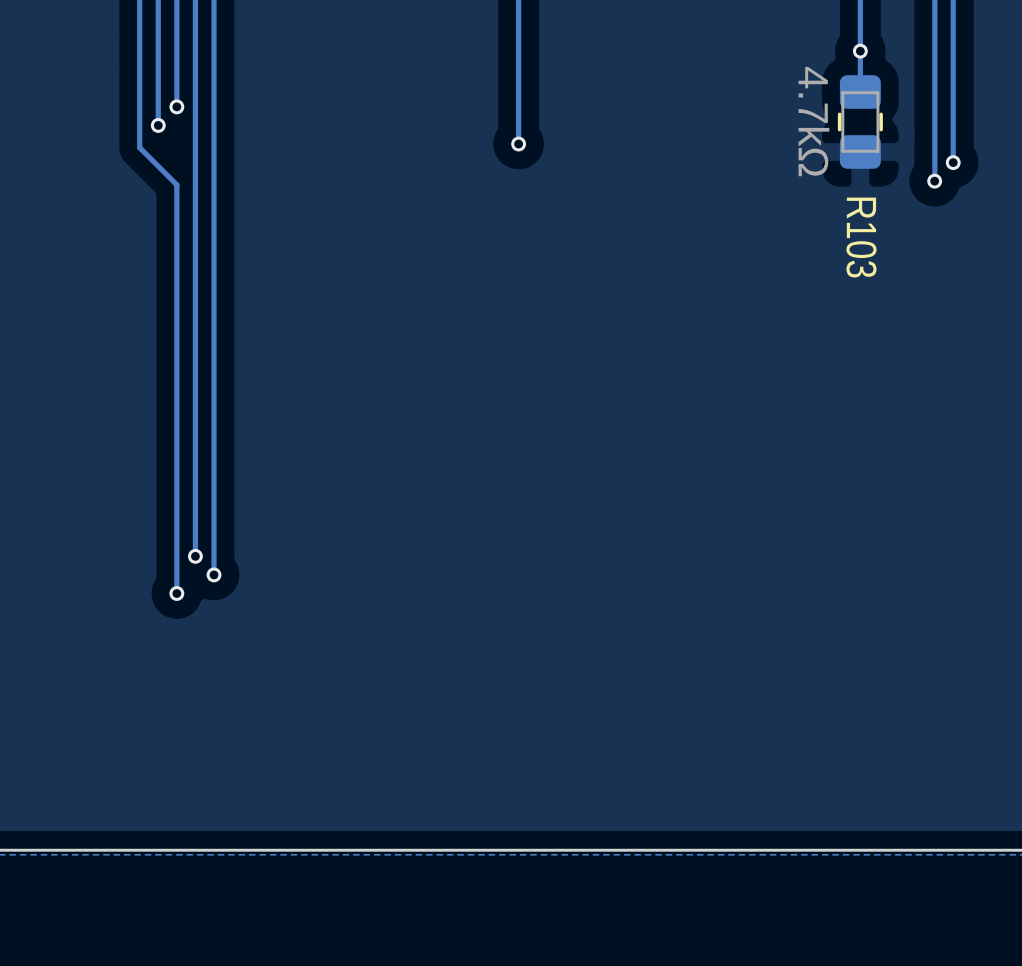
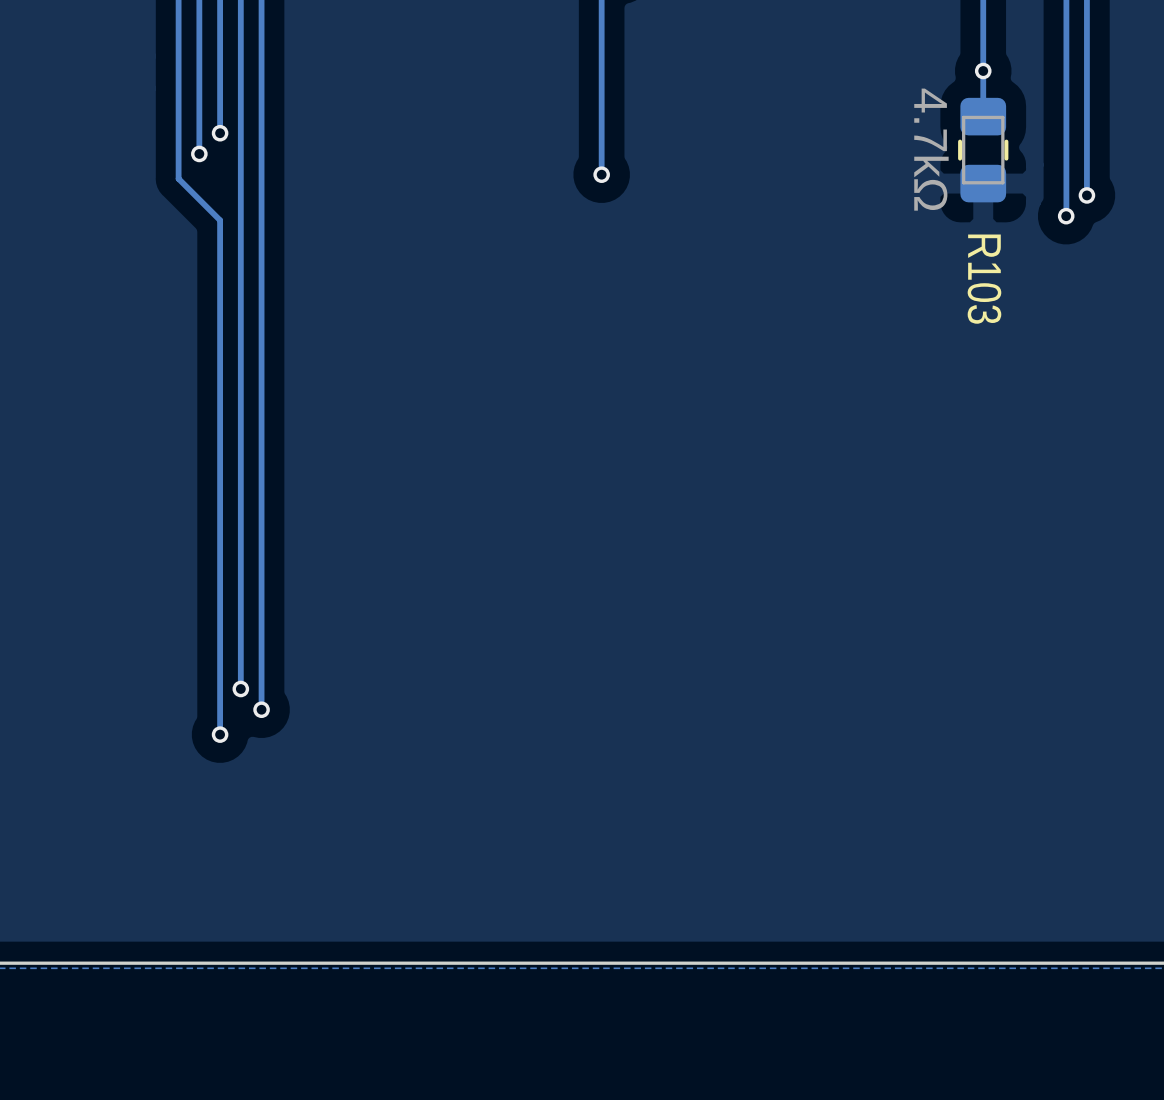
track: none -> (240, 635) (240, 688)
via: (195, 556) -> none
track: none -> (261, 655) (261, 709)
via: (214, 574) -> none
track: none -> (220, 676) (220, 730) (215, 734)
via: (176, 593) -> none
via: none -> (240, 688)
via: none -> (261, 709)
via: none -> (220, 734)

